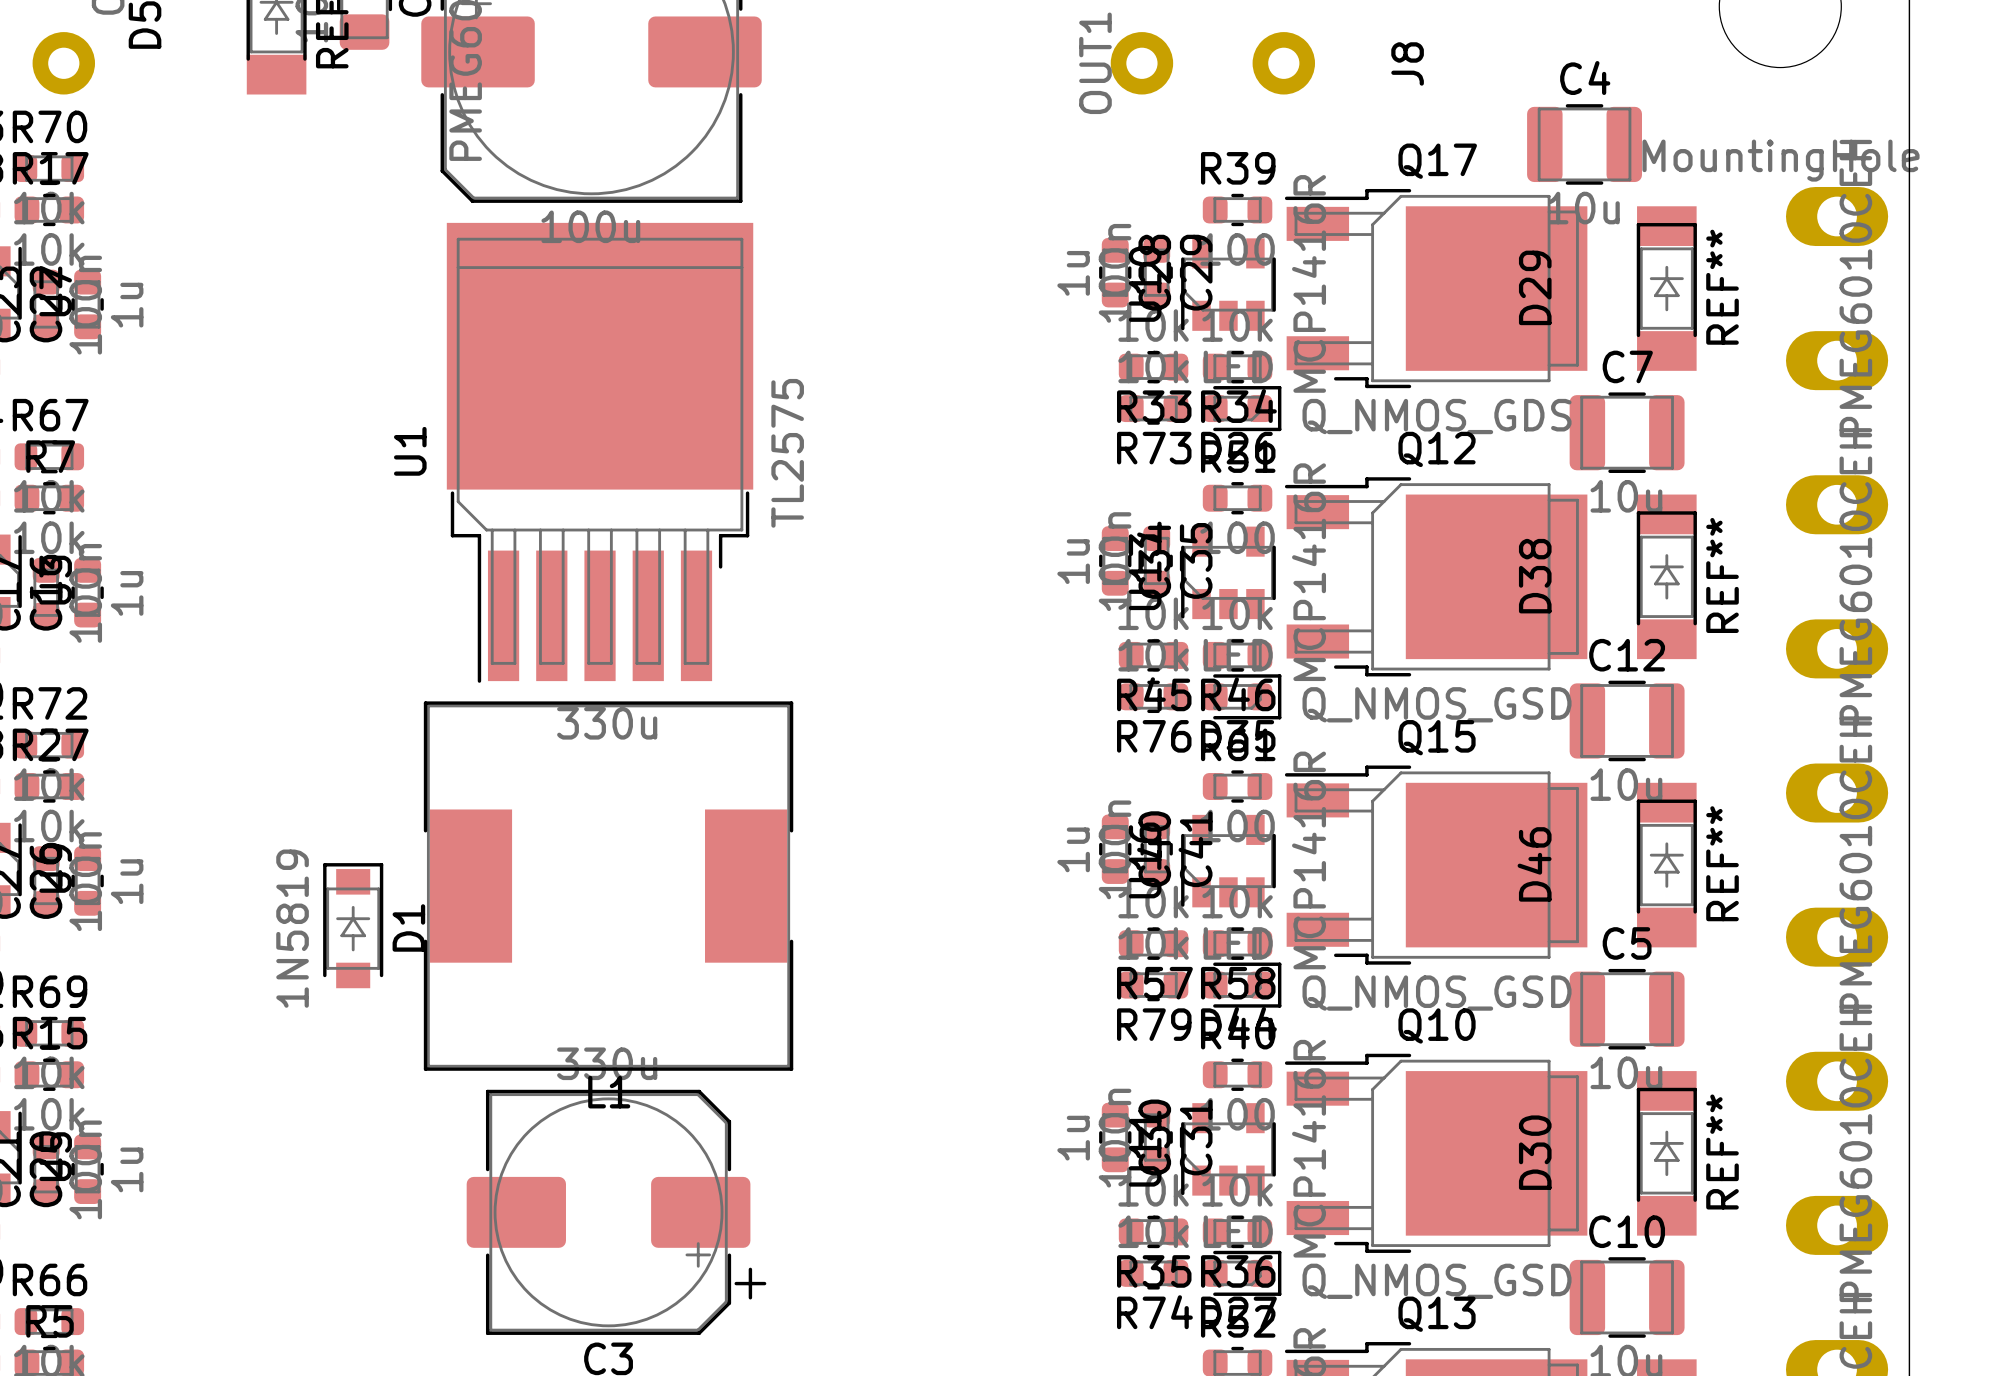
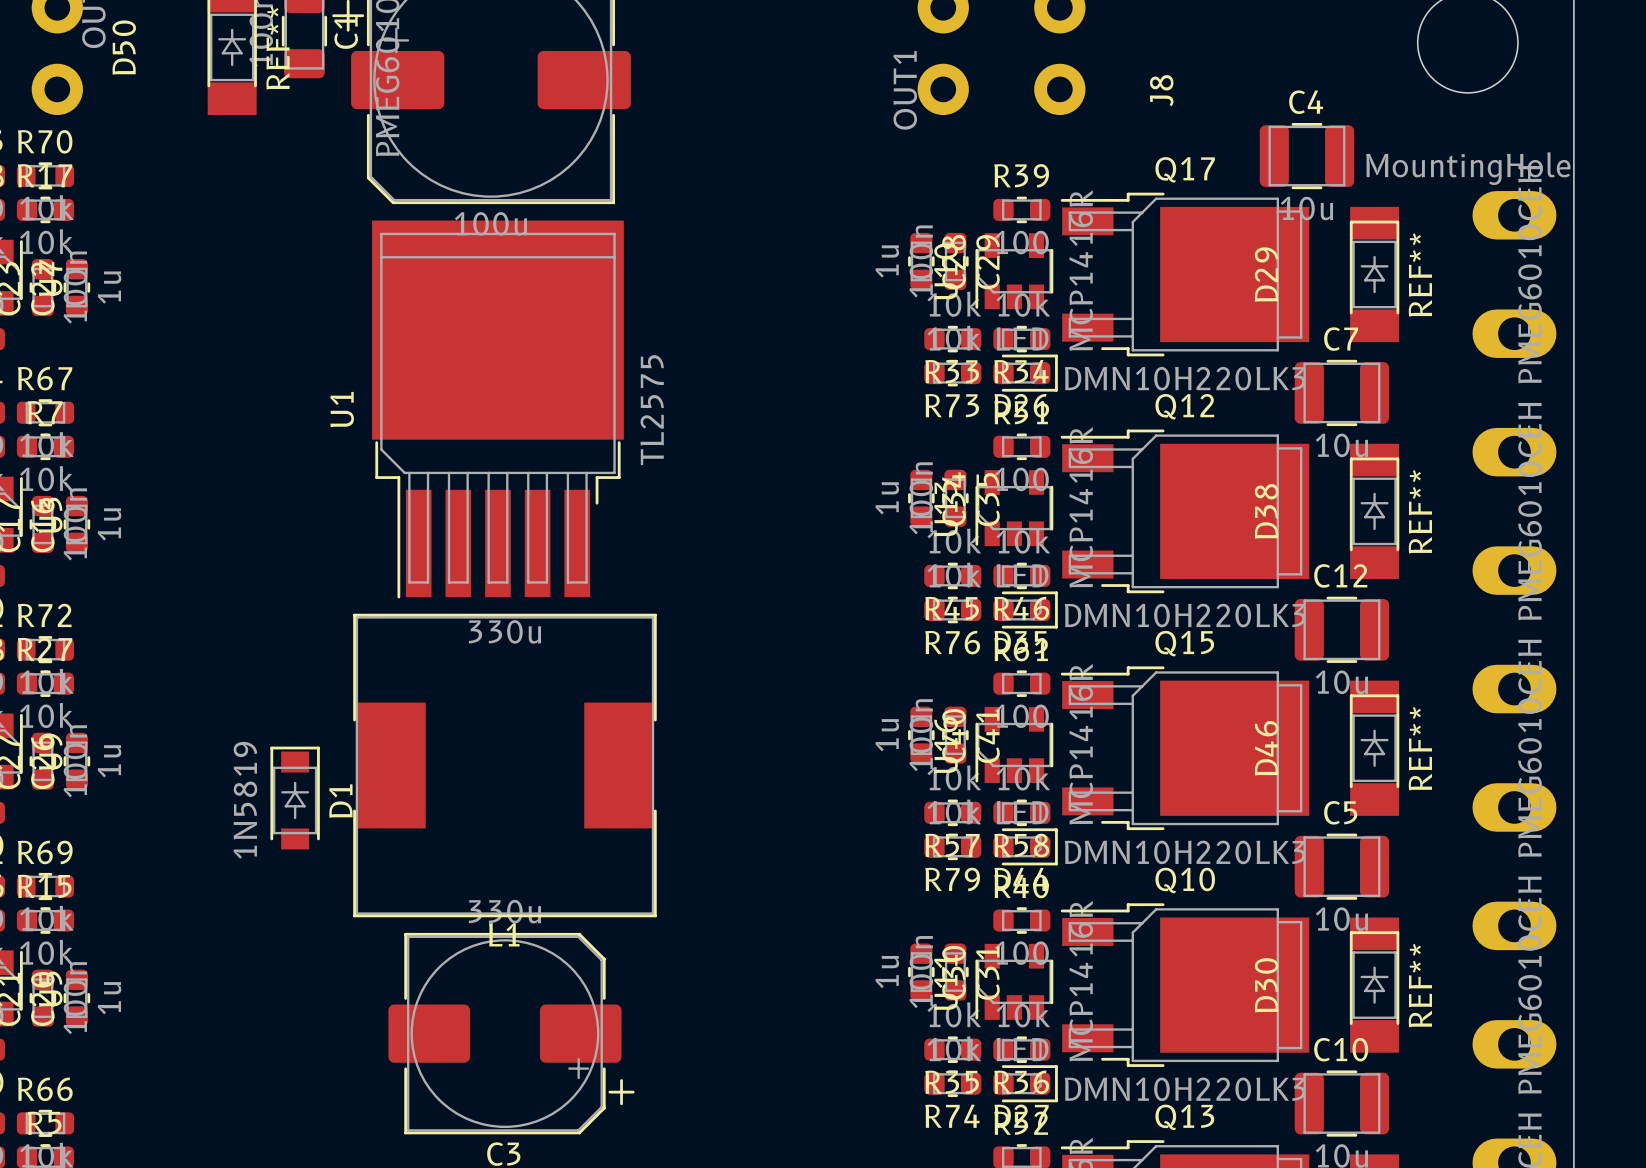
Q17 value: Q_NMOS_GDS (1437, 416) -> DMN10H220LK3 (1185, 378)
Q12 value: Q_NMOS_GSD (1437, 704) -> DMN10H220LK3 (1185, 615)
Q15 value: Q_NMOS_GSD (1437, 993) -> DMN10H220LK3 (1185, 852)
Q10 value: Q_NMOS_GSD (1437, 1281) -> DMN10H220LK3 (1185, 1089)

